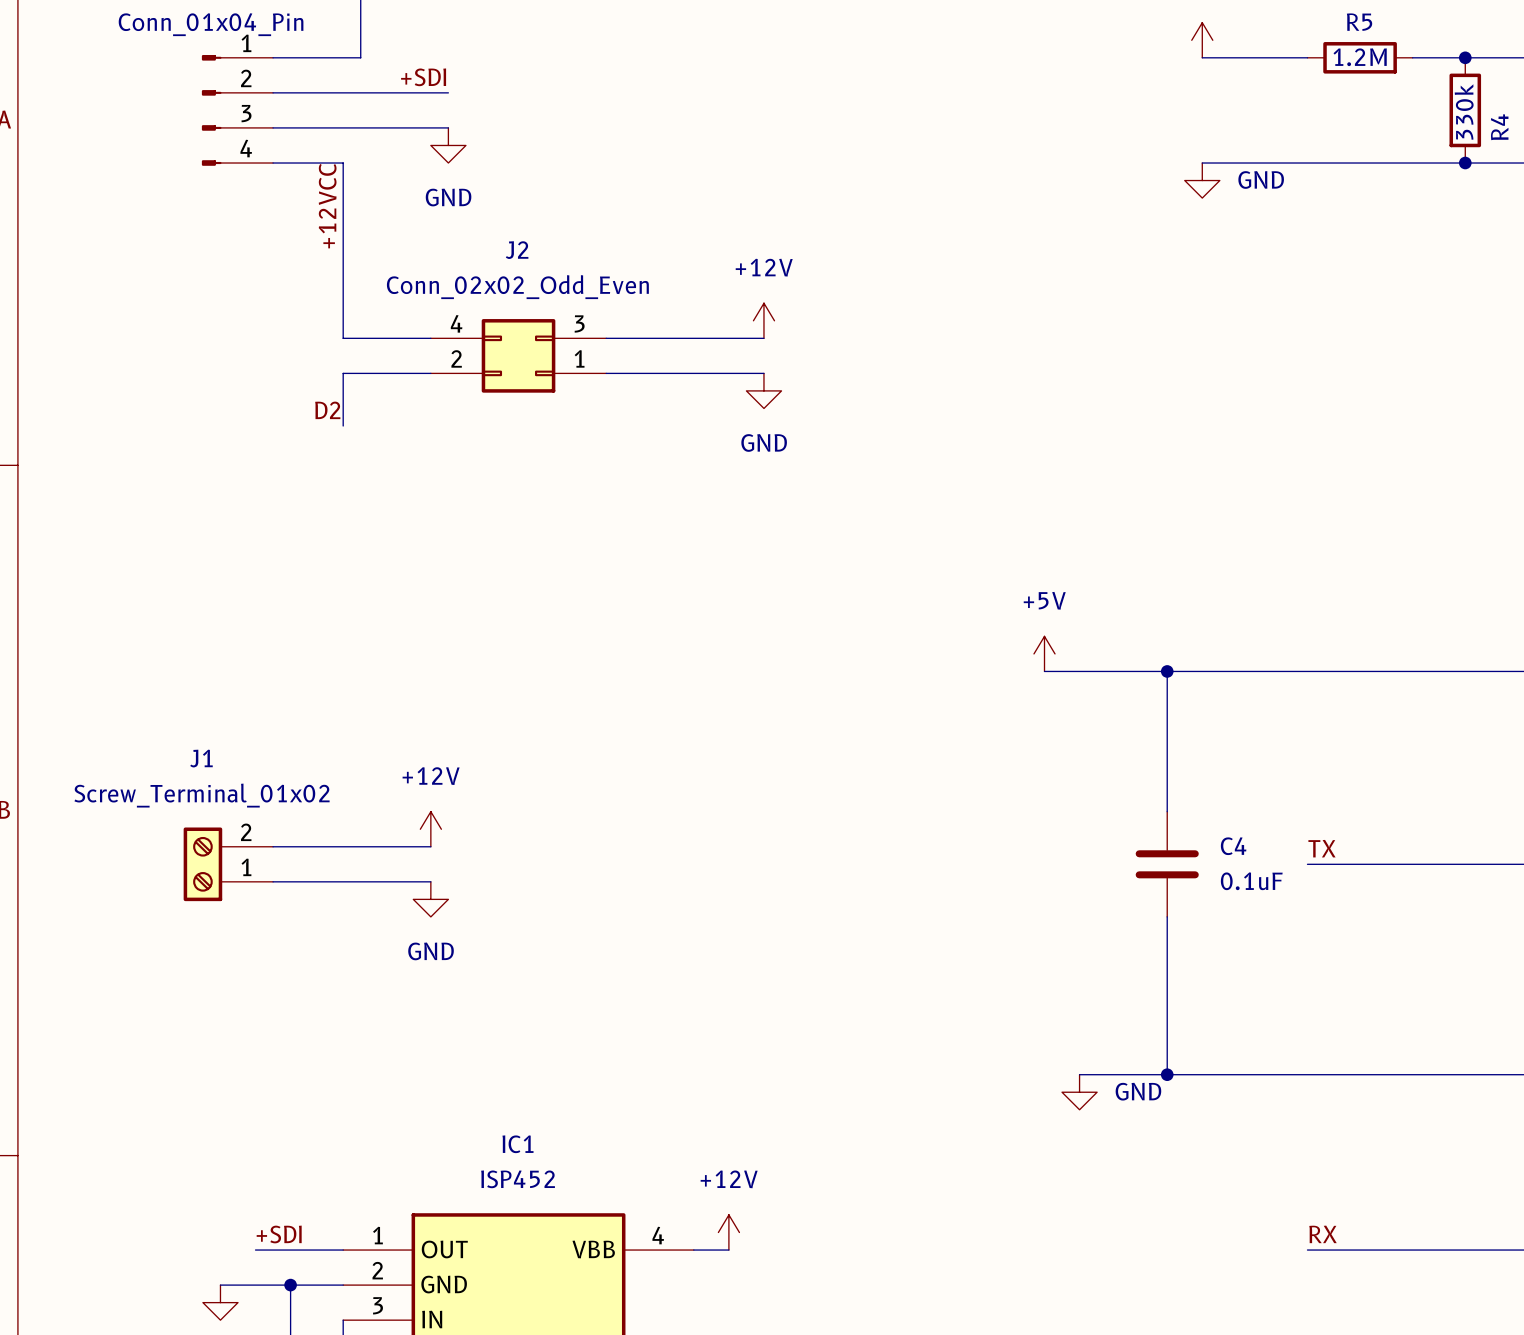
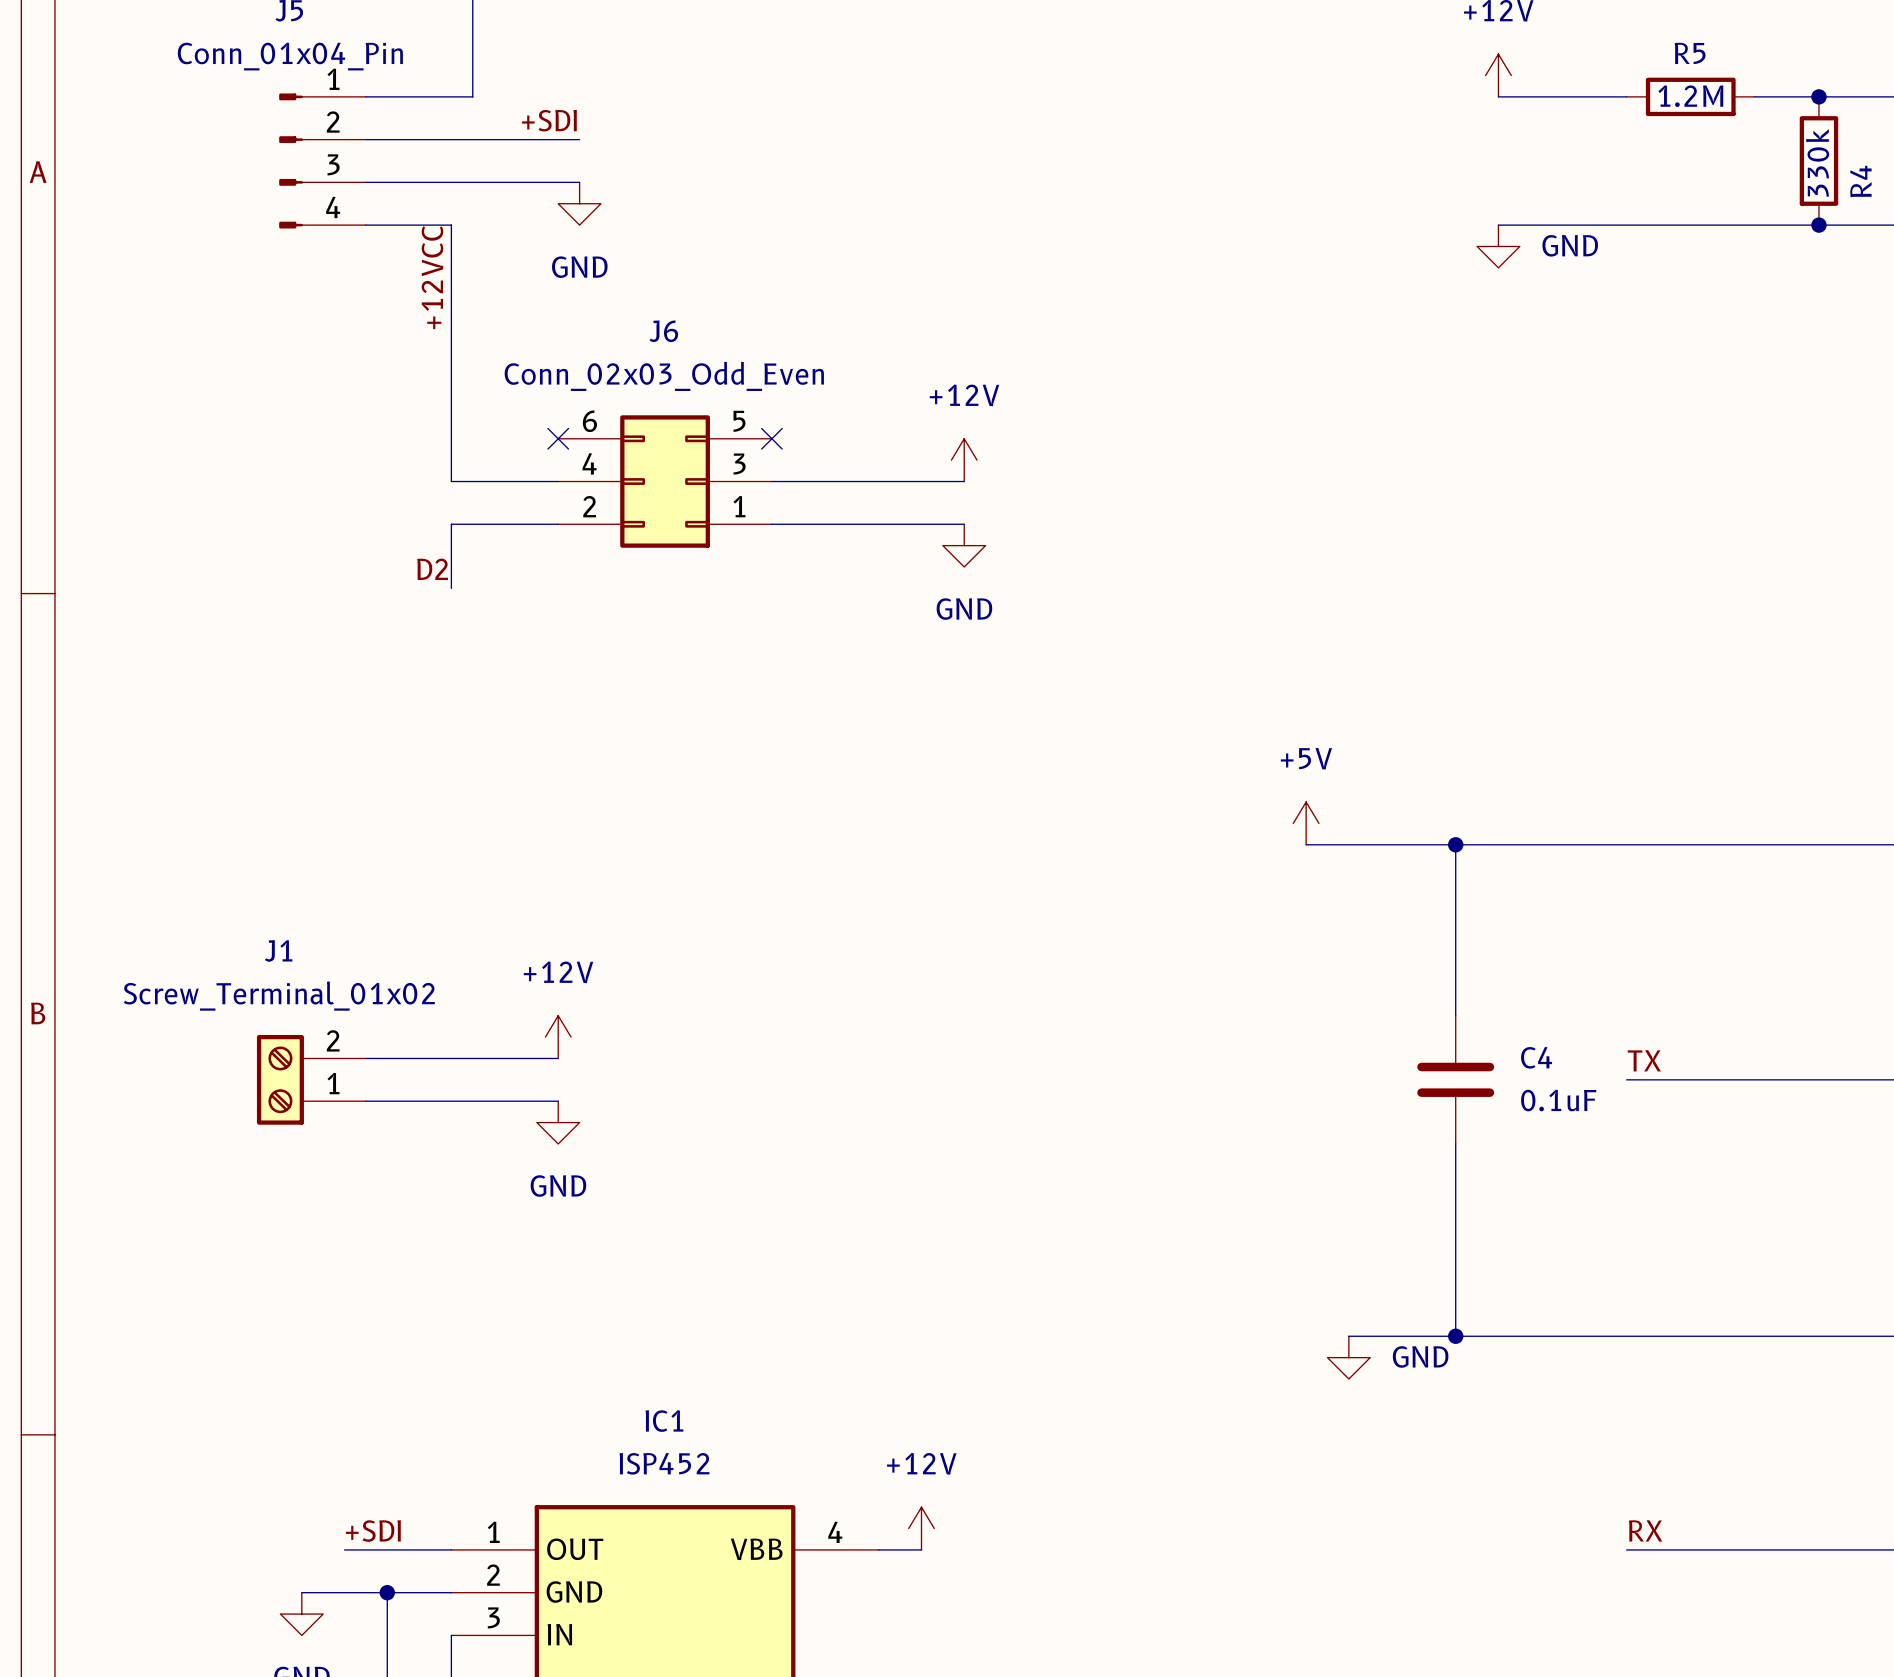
power symbol position: +12V (763, 320) -> +12V (964, 460)
wire: (343, 338) (430, 338) -> (451, 524) (558, 524)
no-connect mark: none -> (558, 438)
wire: (606, 338) (763, 338) -> (771, 524) (964, 524)
no-connect mark: none -> (771, 438)
J2: Conn_02x02_Odd_Even (518, 355) -> none
wire: (343, 373) (343, 408) -> (451, 481) (451, 438)
J6: none -> Conn_02x03_Odd_Even (665, 481)
power symbol position: GND (763, 390) -> GND (964, 545)
label position: D2 (327, 410) -> D2 (432, 569)
wire: none -> (451, 545) (451, 588)

